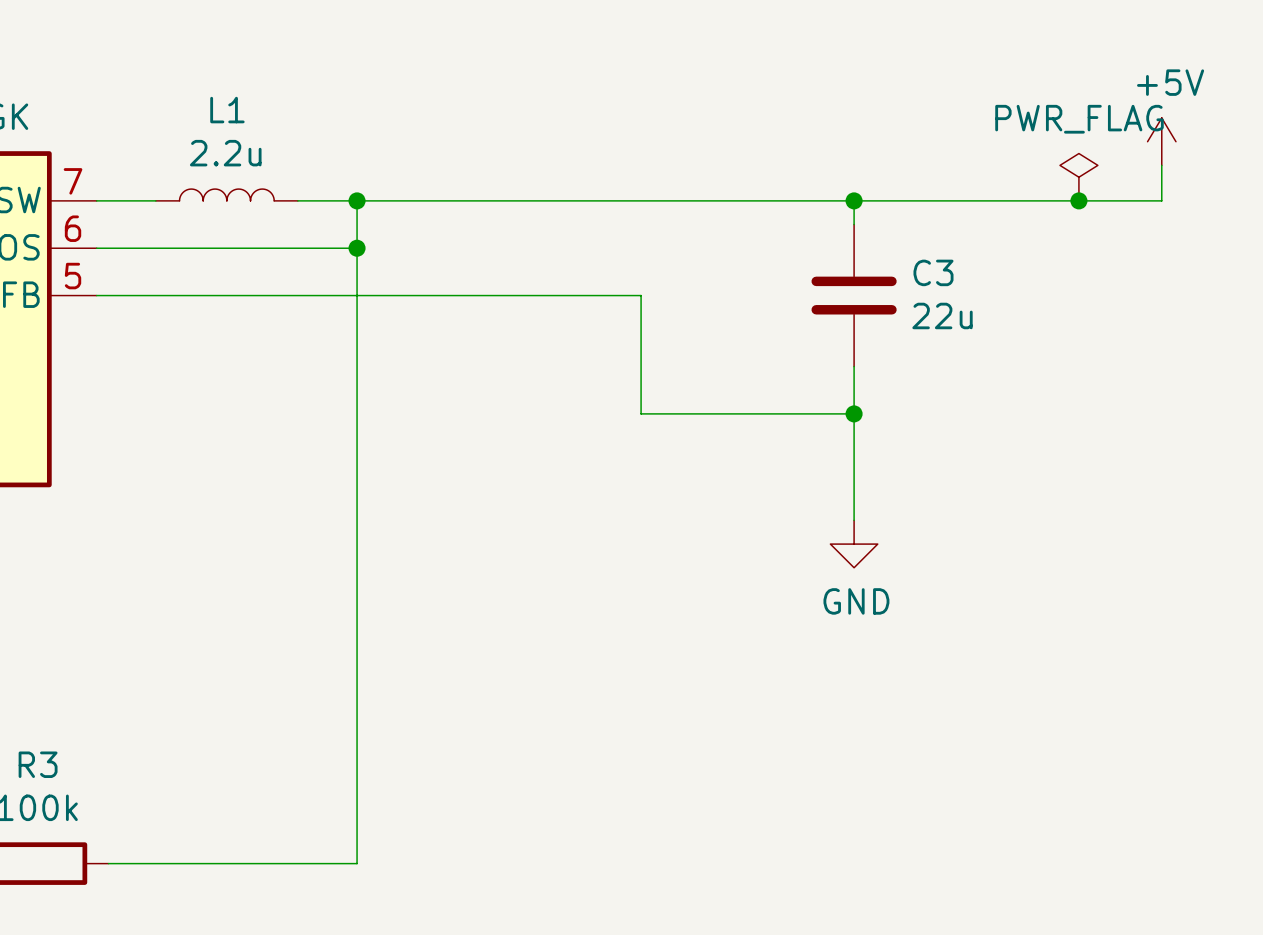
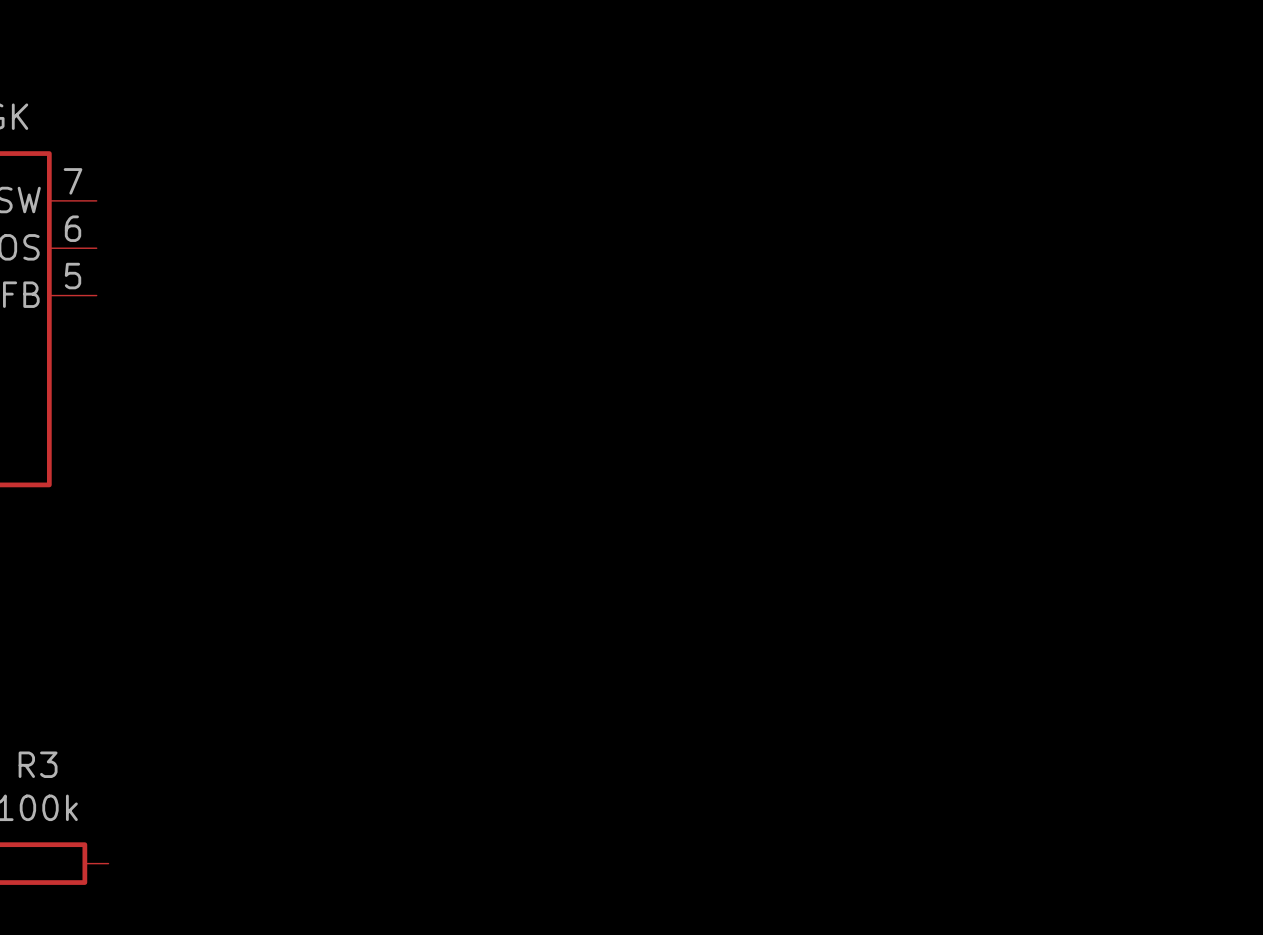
power symbol: +5V (1161, 141) -> none
wire: (1161, 165) (1161, 200) (297, 200) -> none
power symbol: PWR_FLAG (1078, 177) -> none
L1: 2.2u (226, 194) -> none
wire: (96, 200) (155, 200) -> none
wire: (357, 200) (357, 863) (108, 863) -> none
junction: (357, 200) -> none
wire: (854, 200) (854, 224) -> none
junction: (854, 200) -> none
junction: (1078, 200) -> none
wire: (96, 248) (357, 248) -> none
junction: (357, 248) -> none
wire: (96, 295) (641, 295) (641, 413) (854, 413) -> none
C3: 22u (854, 295) -> none
wire: (854, 366) (854, 520) -> none
junction: (854, 413) -> none
power symbol: GND (854, 544) -> none

